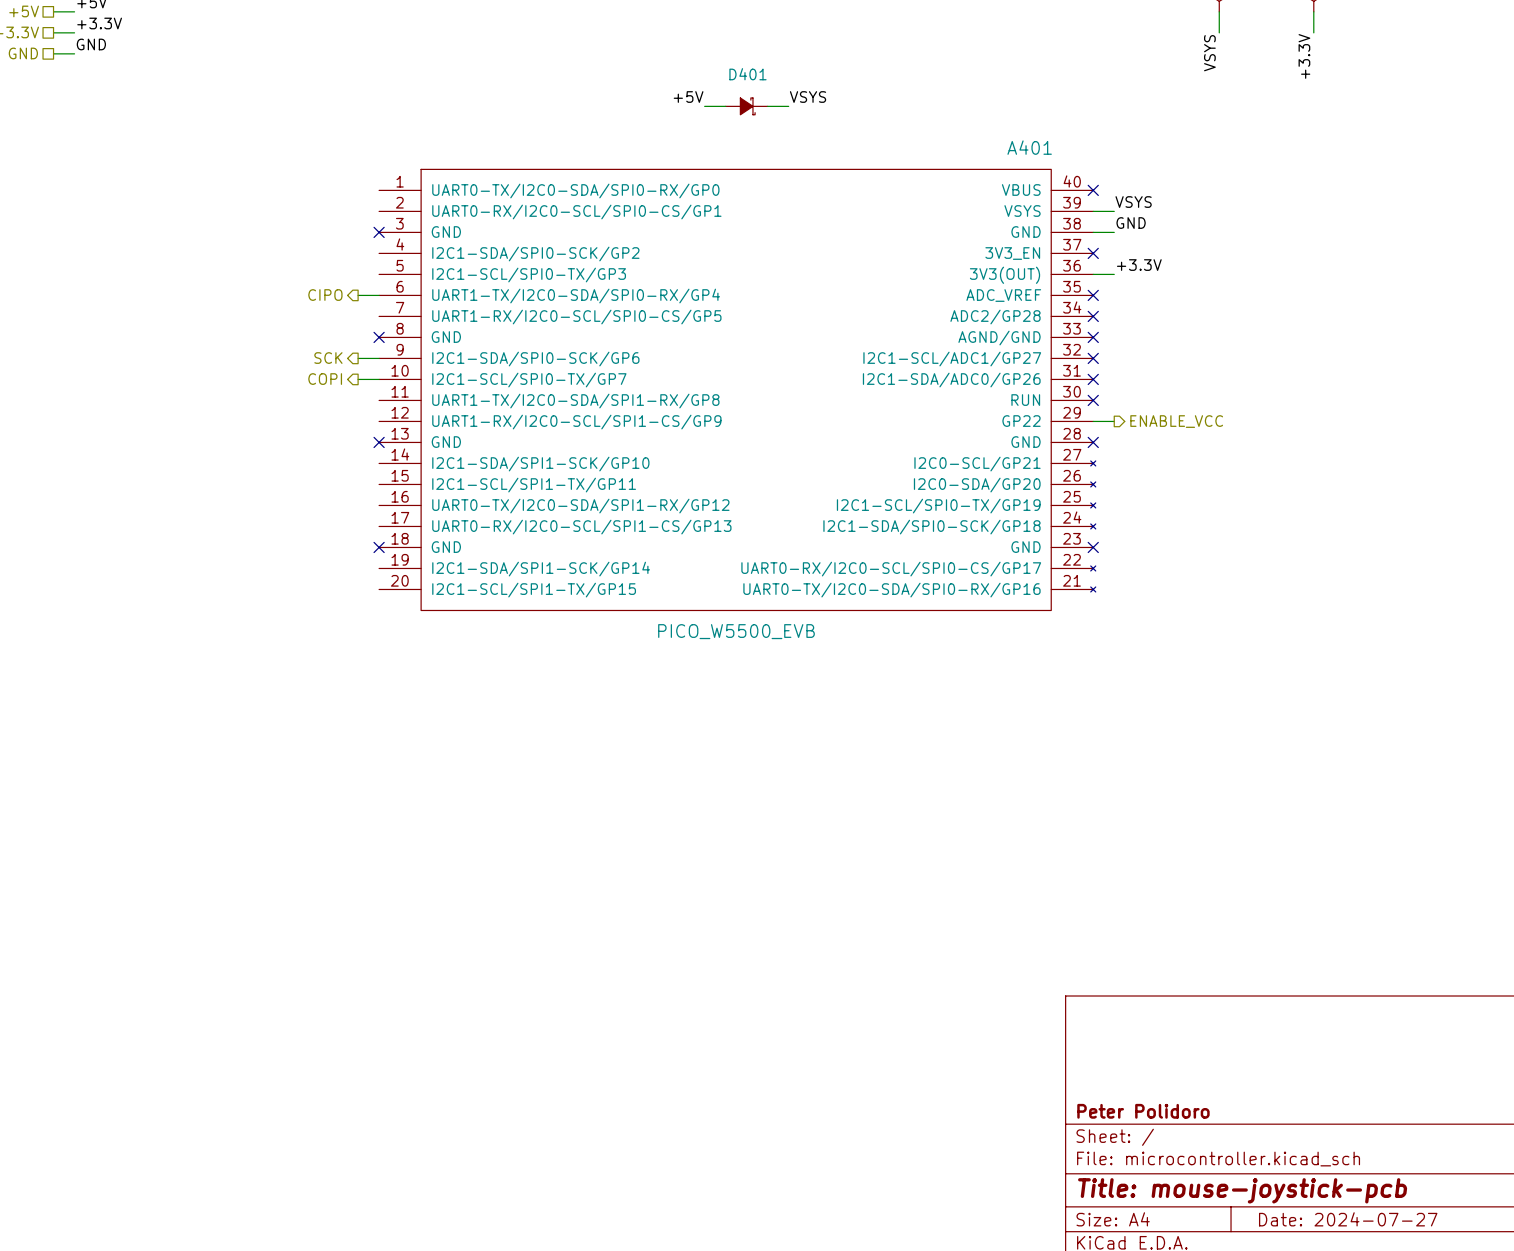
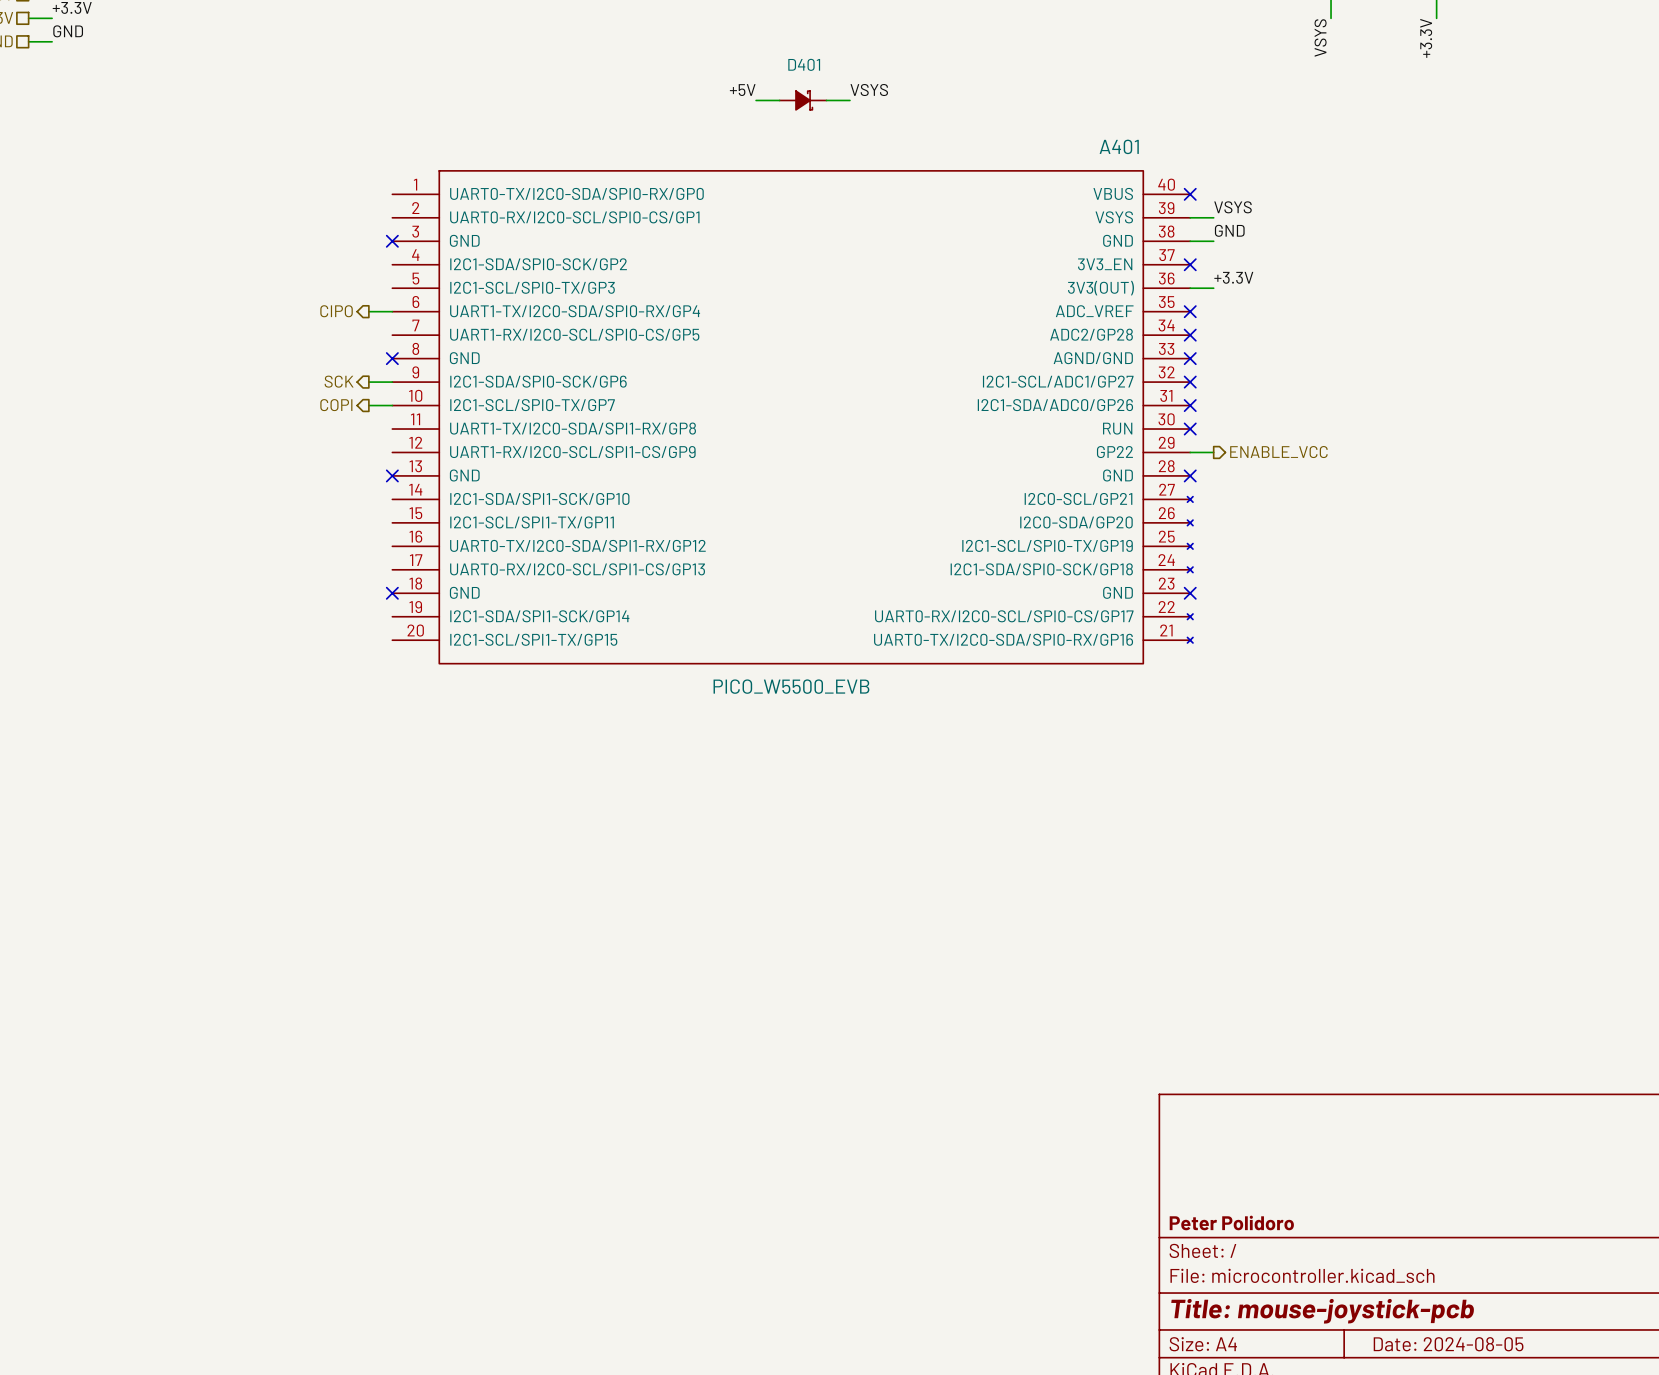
title block: Date: 2024-07-27 (1348, 1219) -> Date: 2024-08-05 (1448, 1344)

